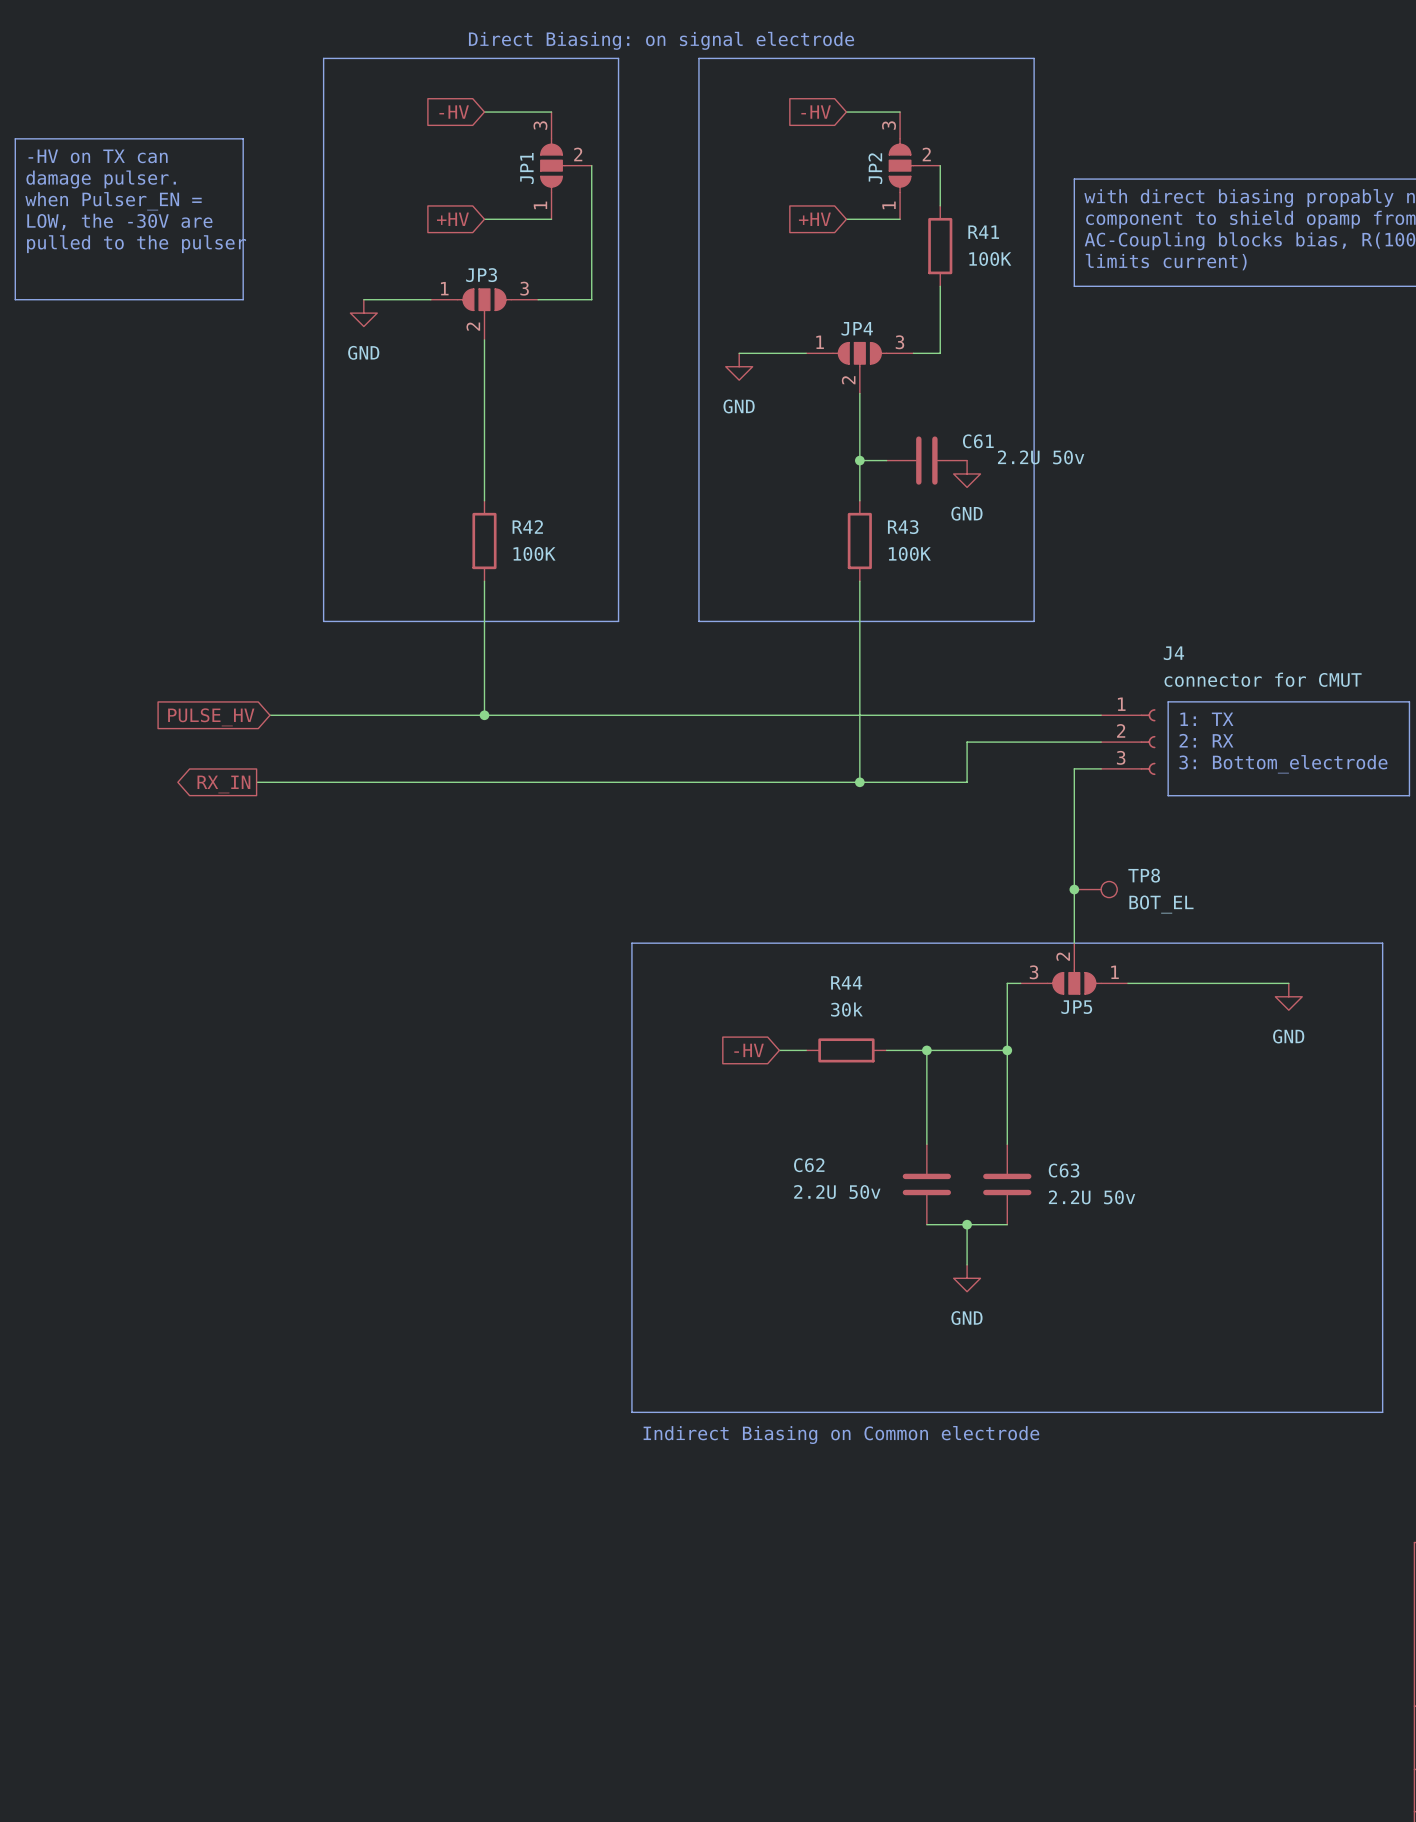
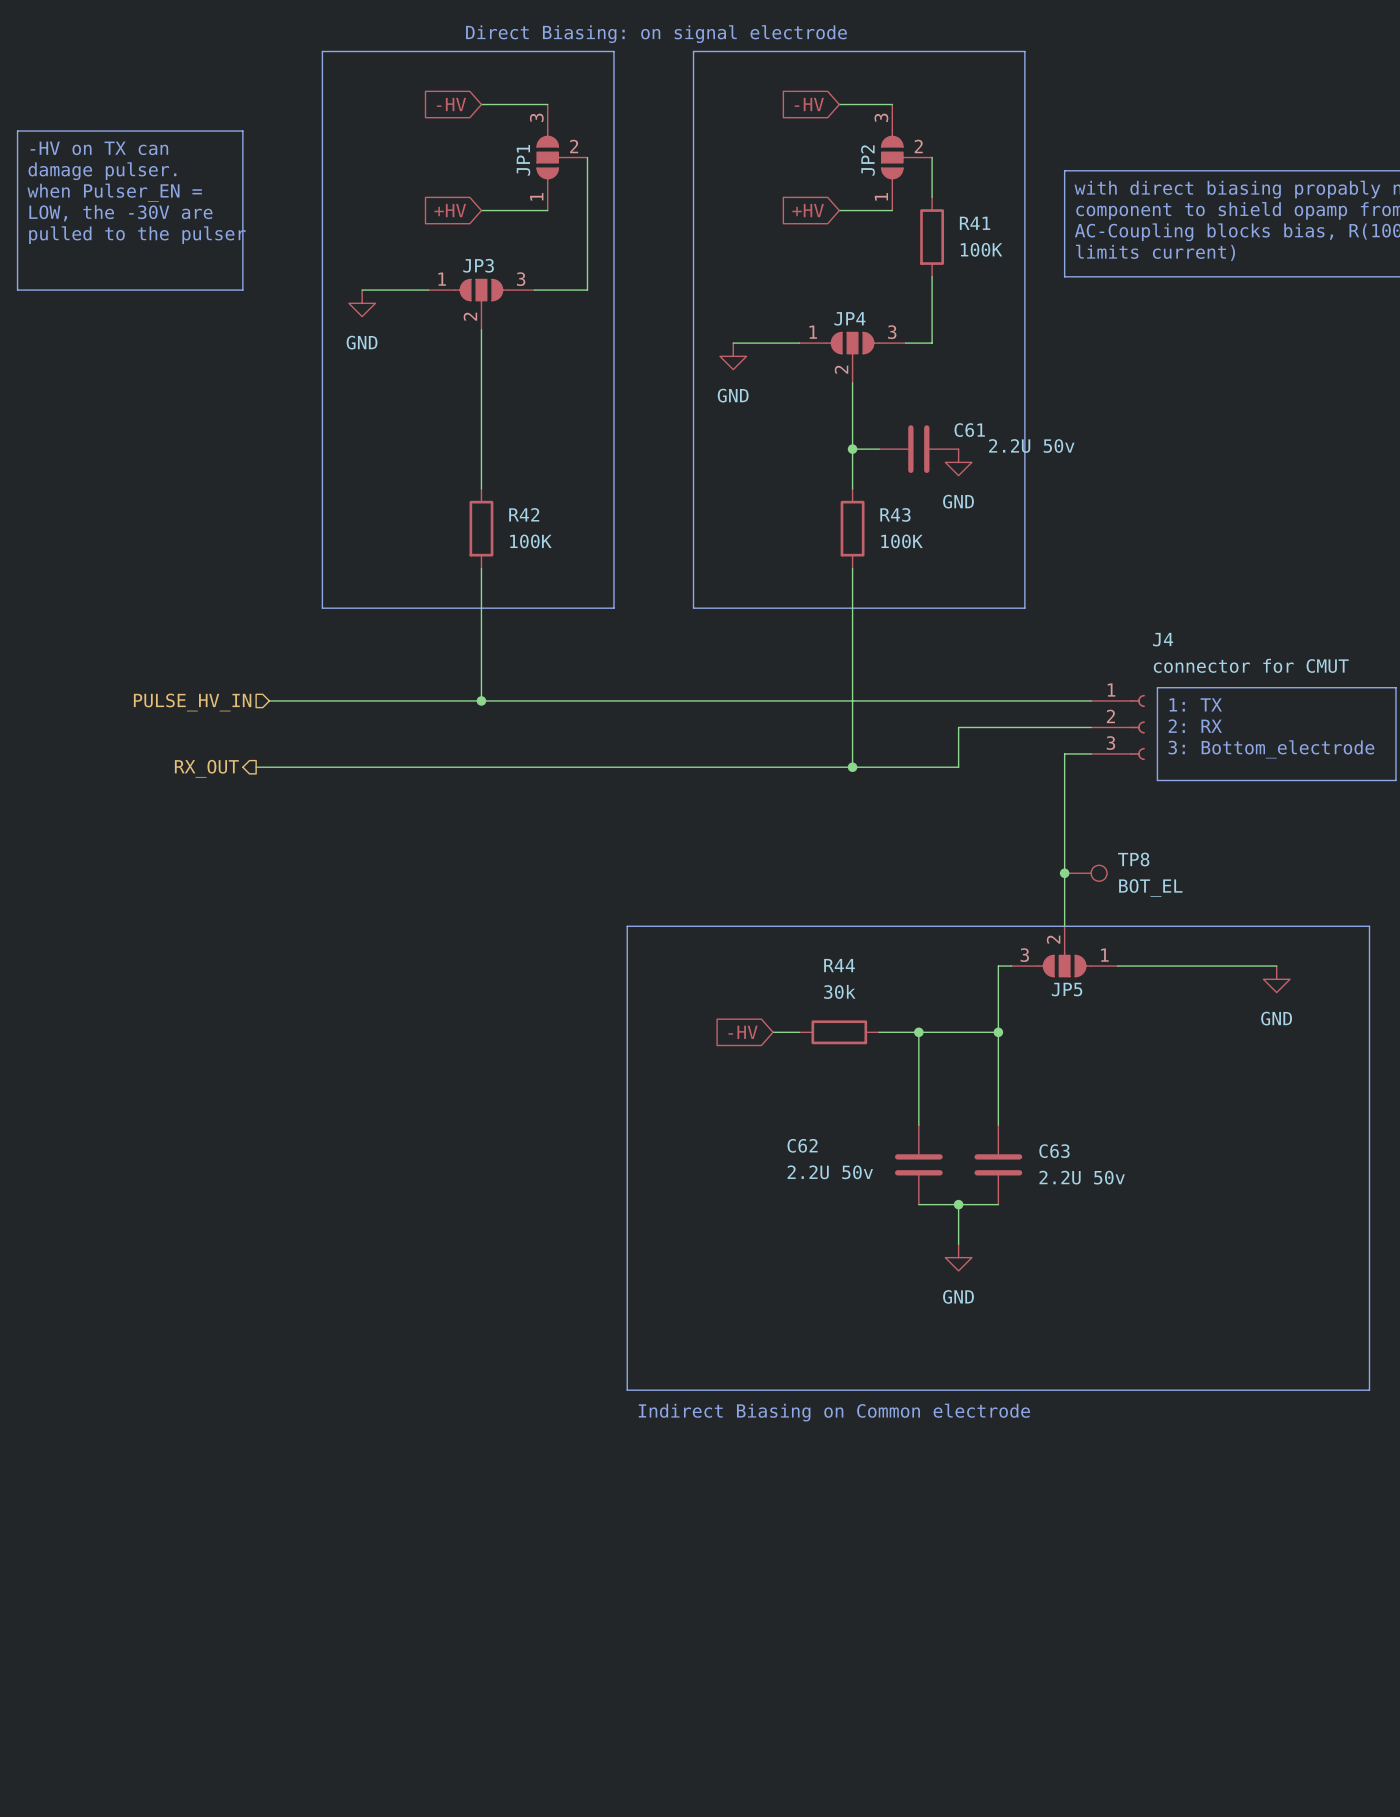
hierarchical label: none -> PULSE_HV_IN (192, 702)
global label: PULSE_HV (211, 717) -> none
hierarchical label: none -> RX_OUT (206, 768)
global label: RX_IN (223, 784) -> none

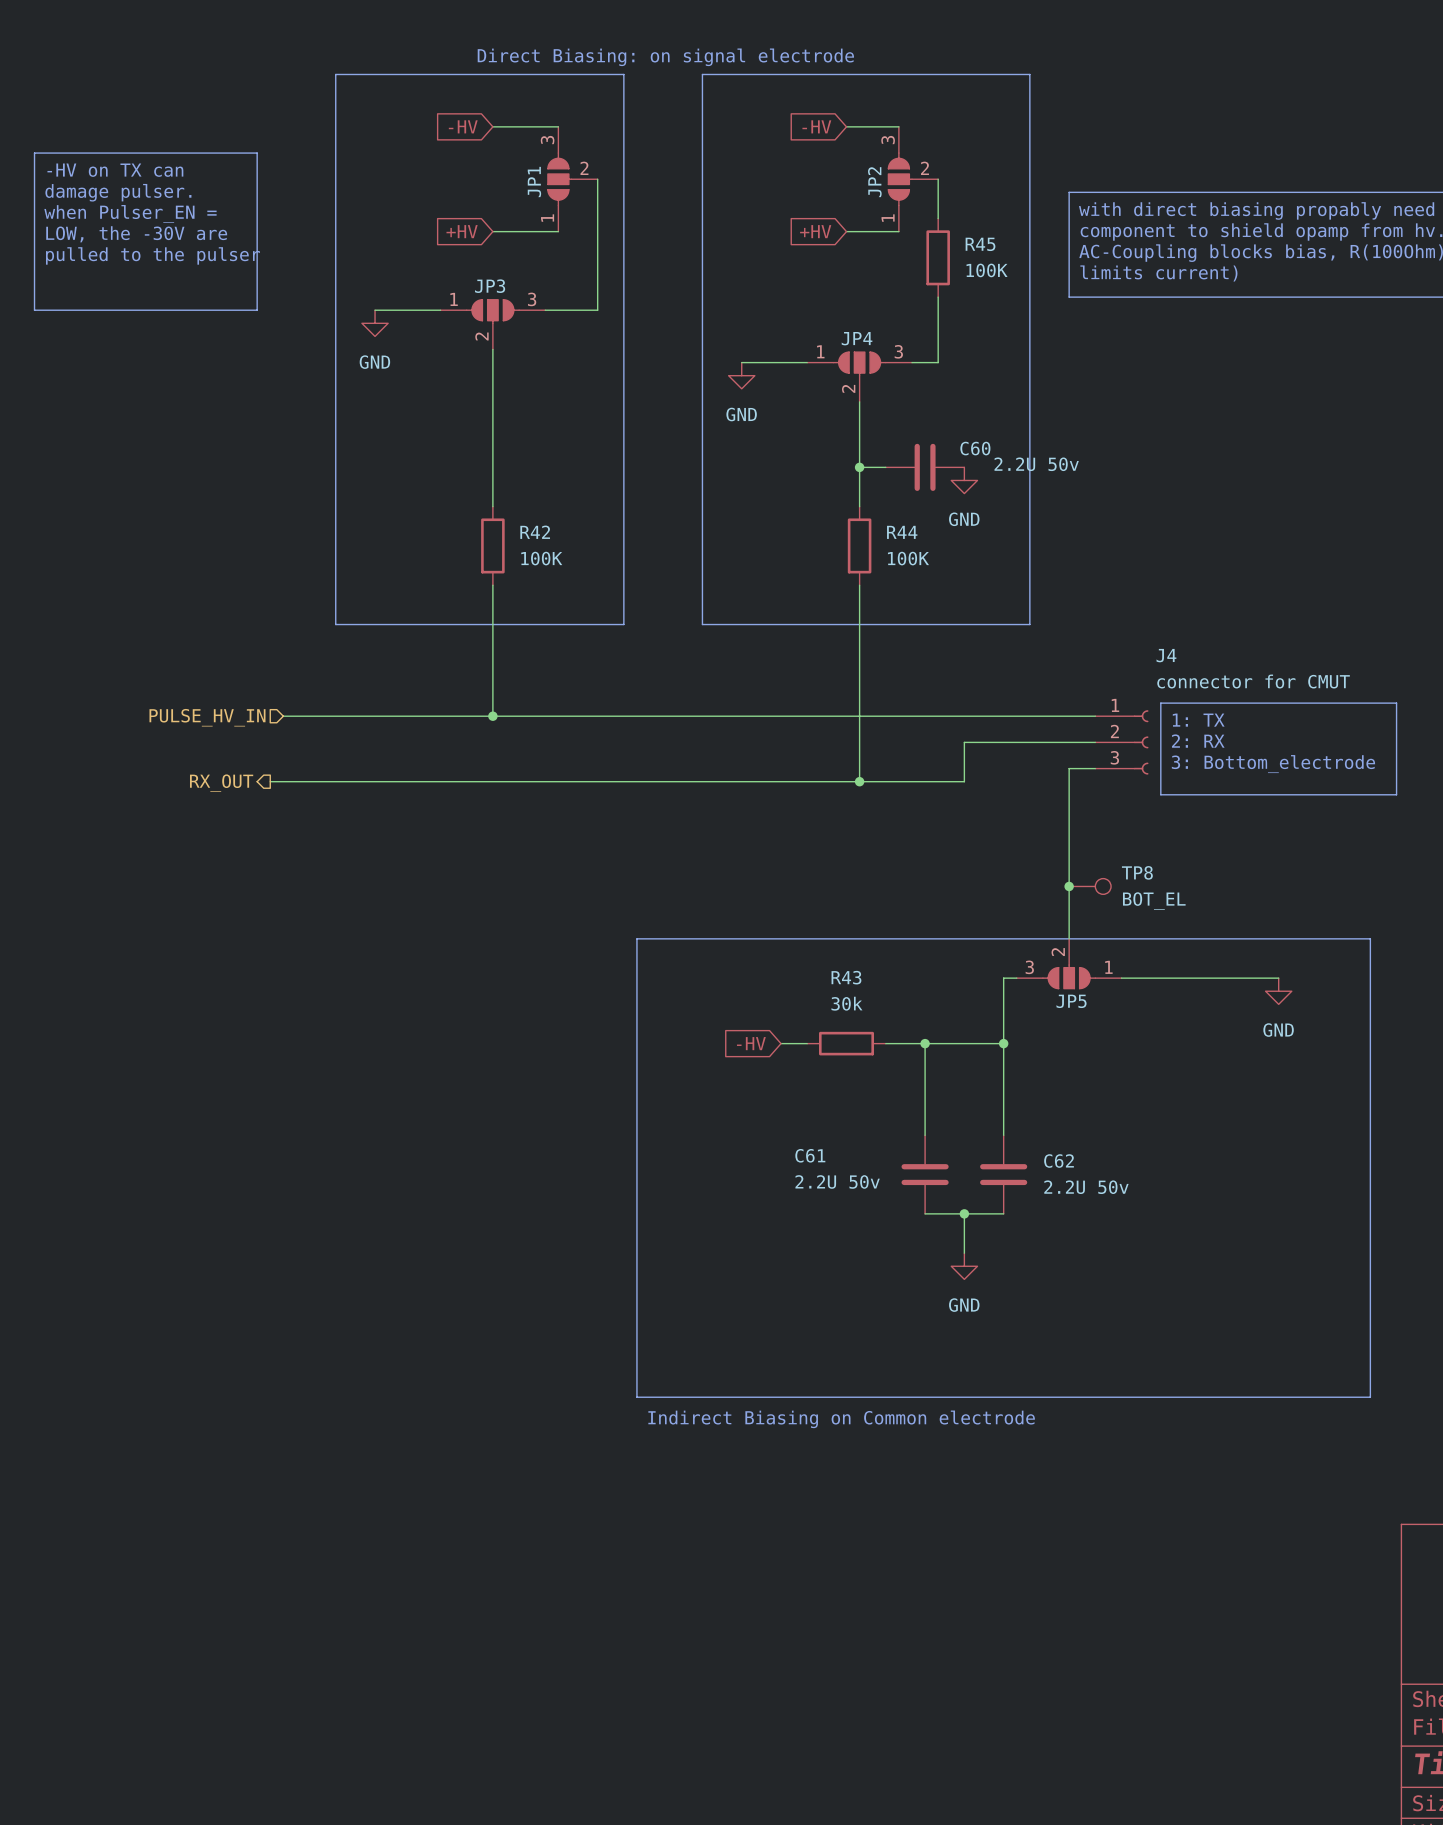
R41 name: R41 (975, 223) -> R45 (980, 244)
C61 name: C61 (969, 430) -> C60 (975, 448)
R43 name: R43 (895, 514) -> R44 (902, 532)
R44 name: R44 (839, 965) -> R43 (846, 977)
C62 name: C62 (802, 1145) -> C61 (810, 1155)
C63 name: C63 (1054, 1151) -> C62 (1059, 1161)

